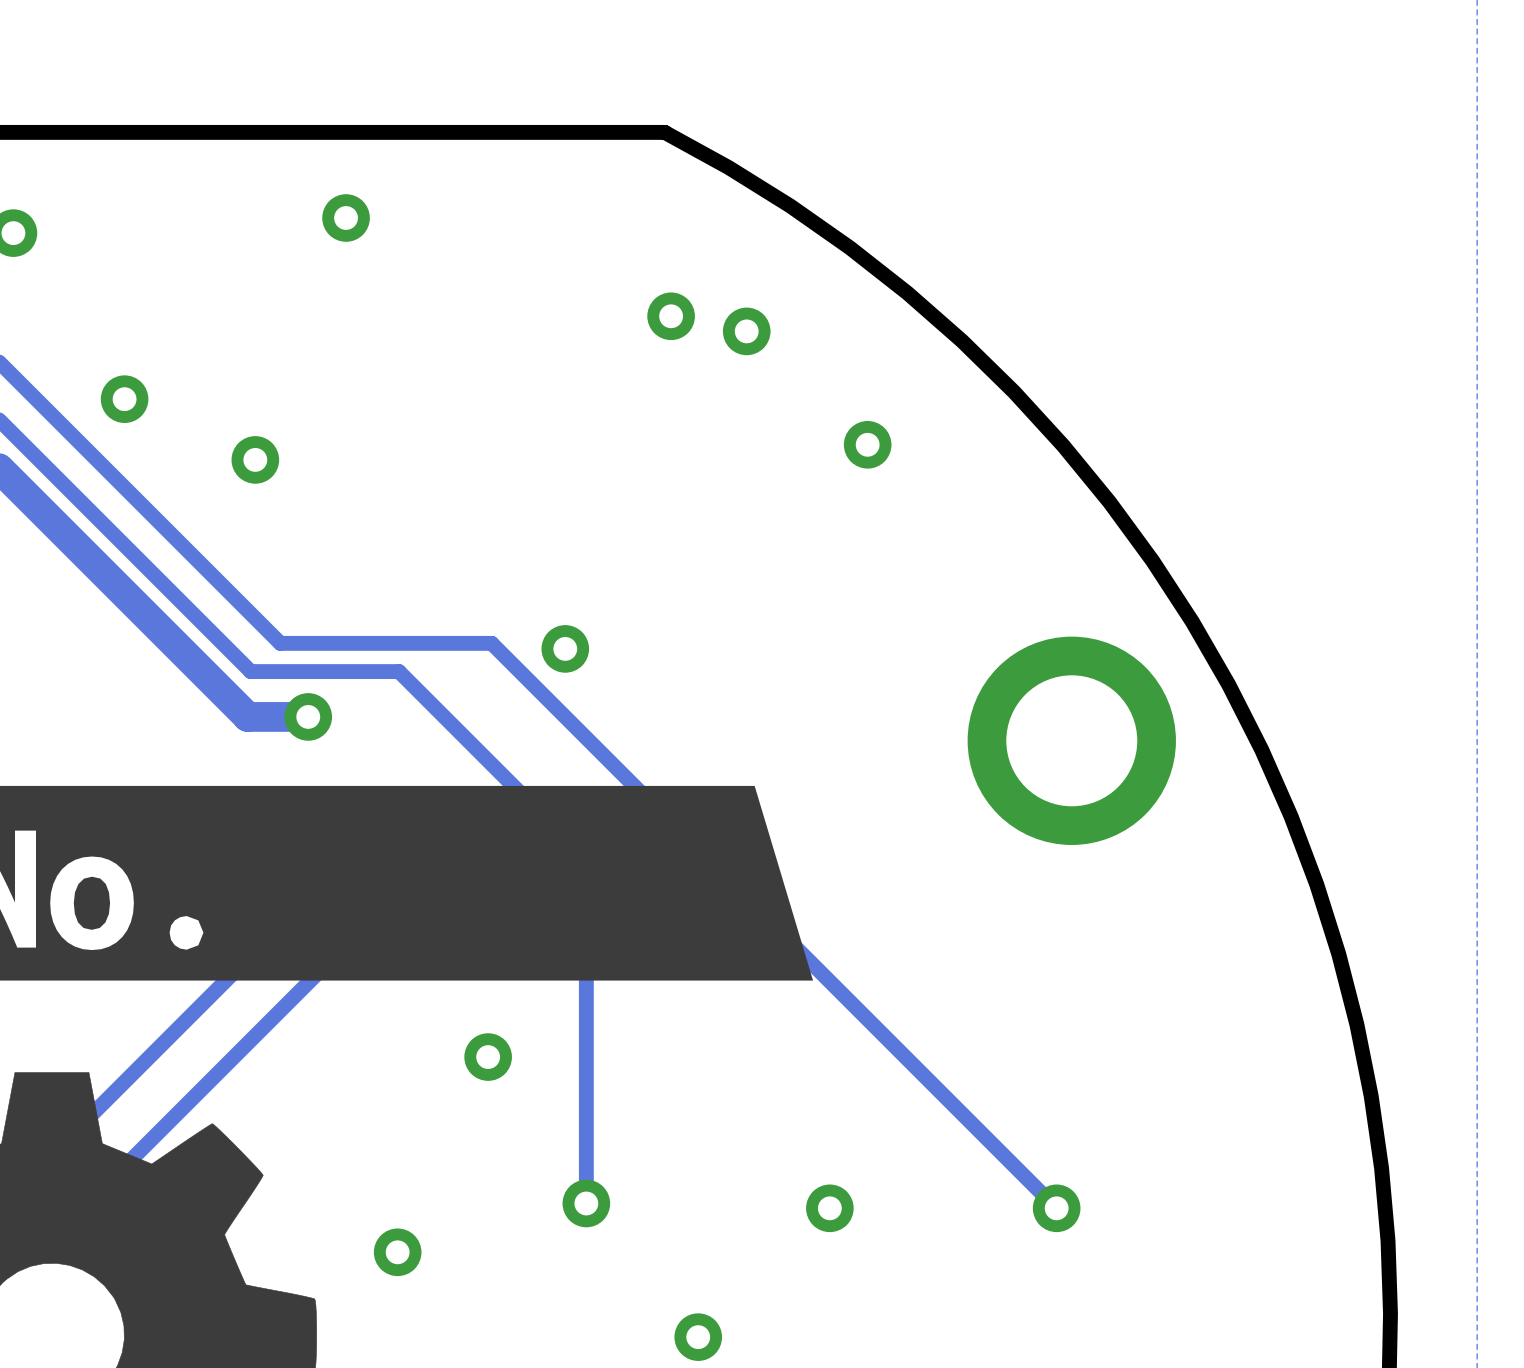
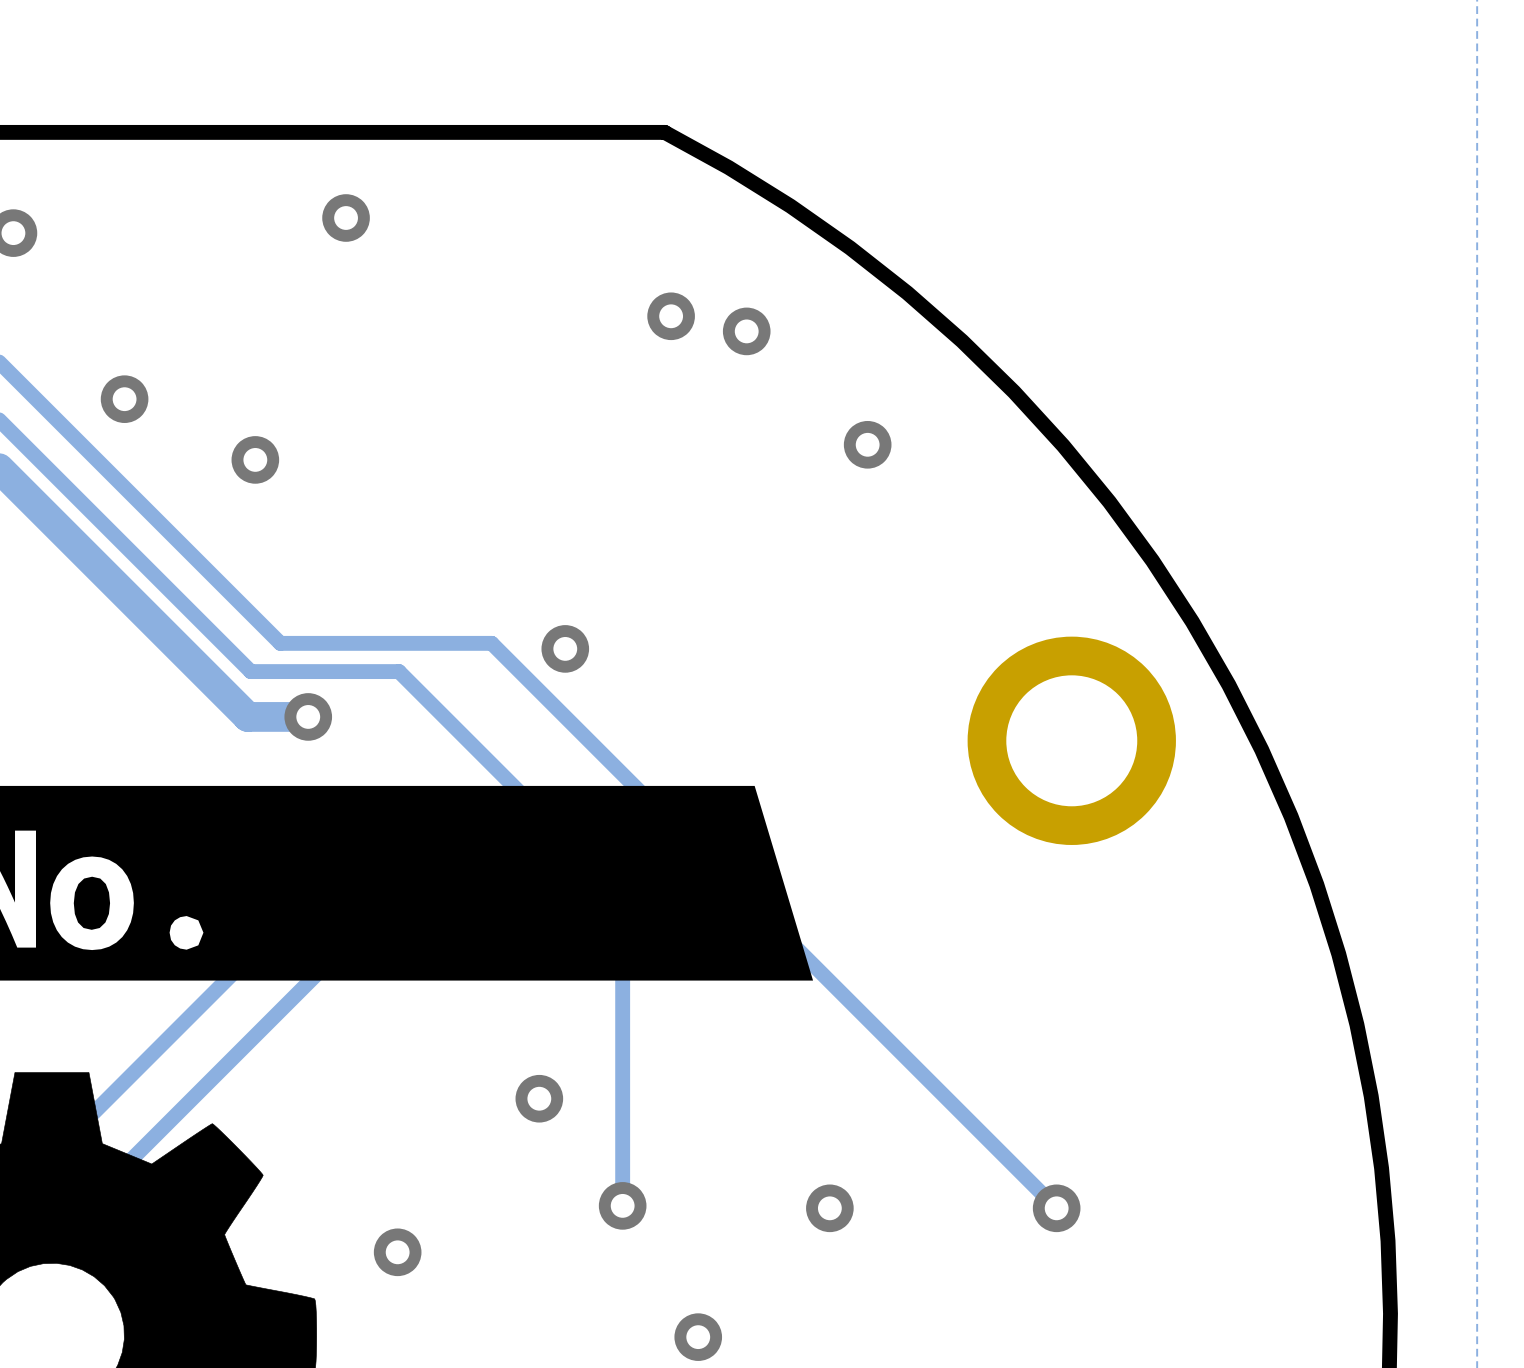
track: (586, 858) (586, 1203) -> (586, 858) (622, 895) (622, 1205)
via: (488, 1057) -> none
via: none -> (539, 1098)
via position: (586, 1203) -> (622, 1205)

